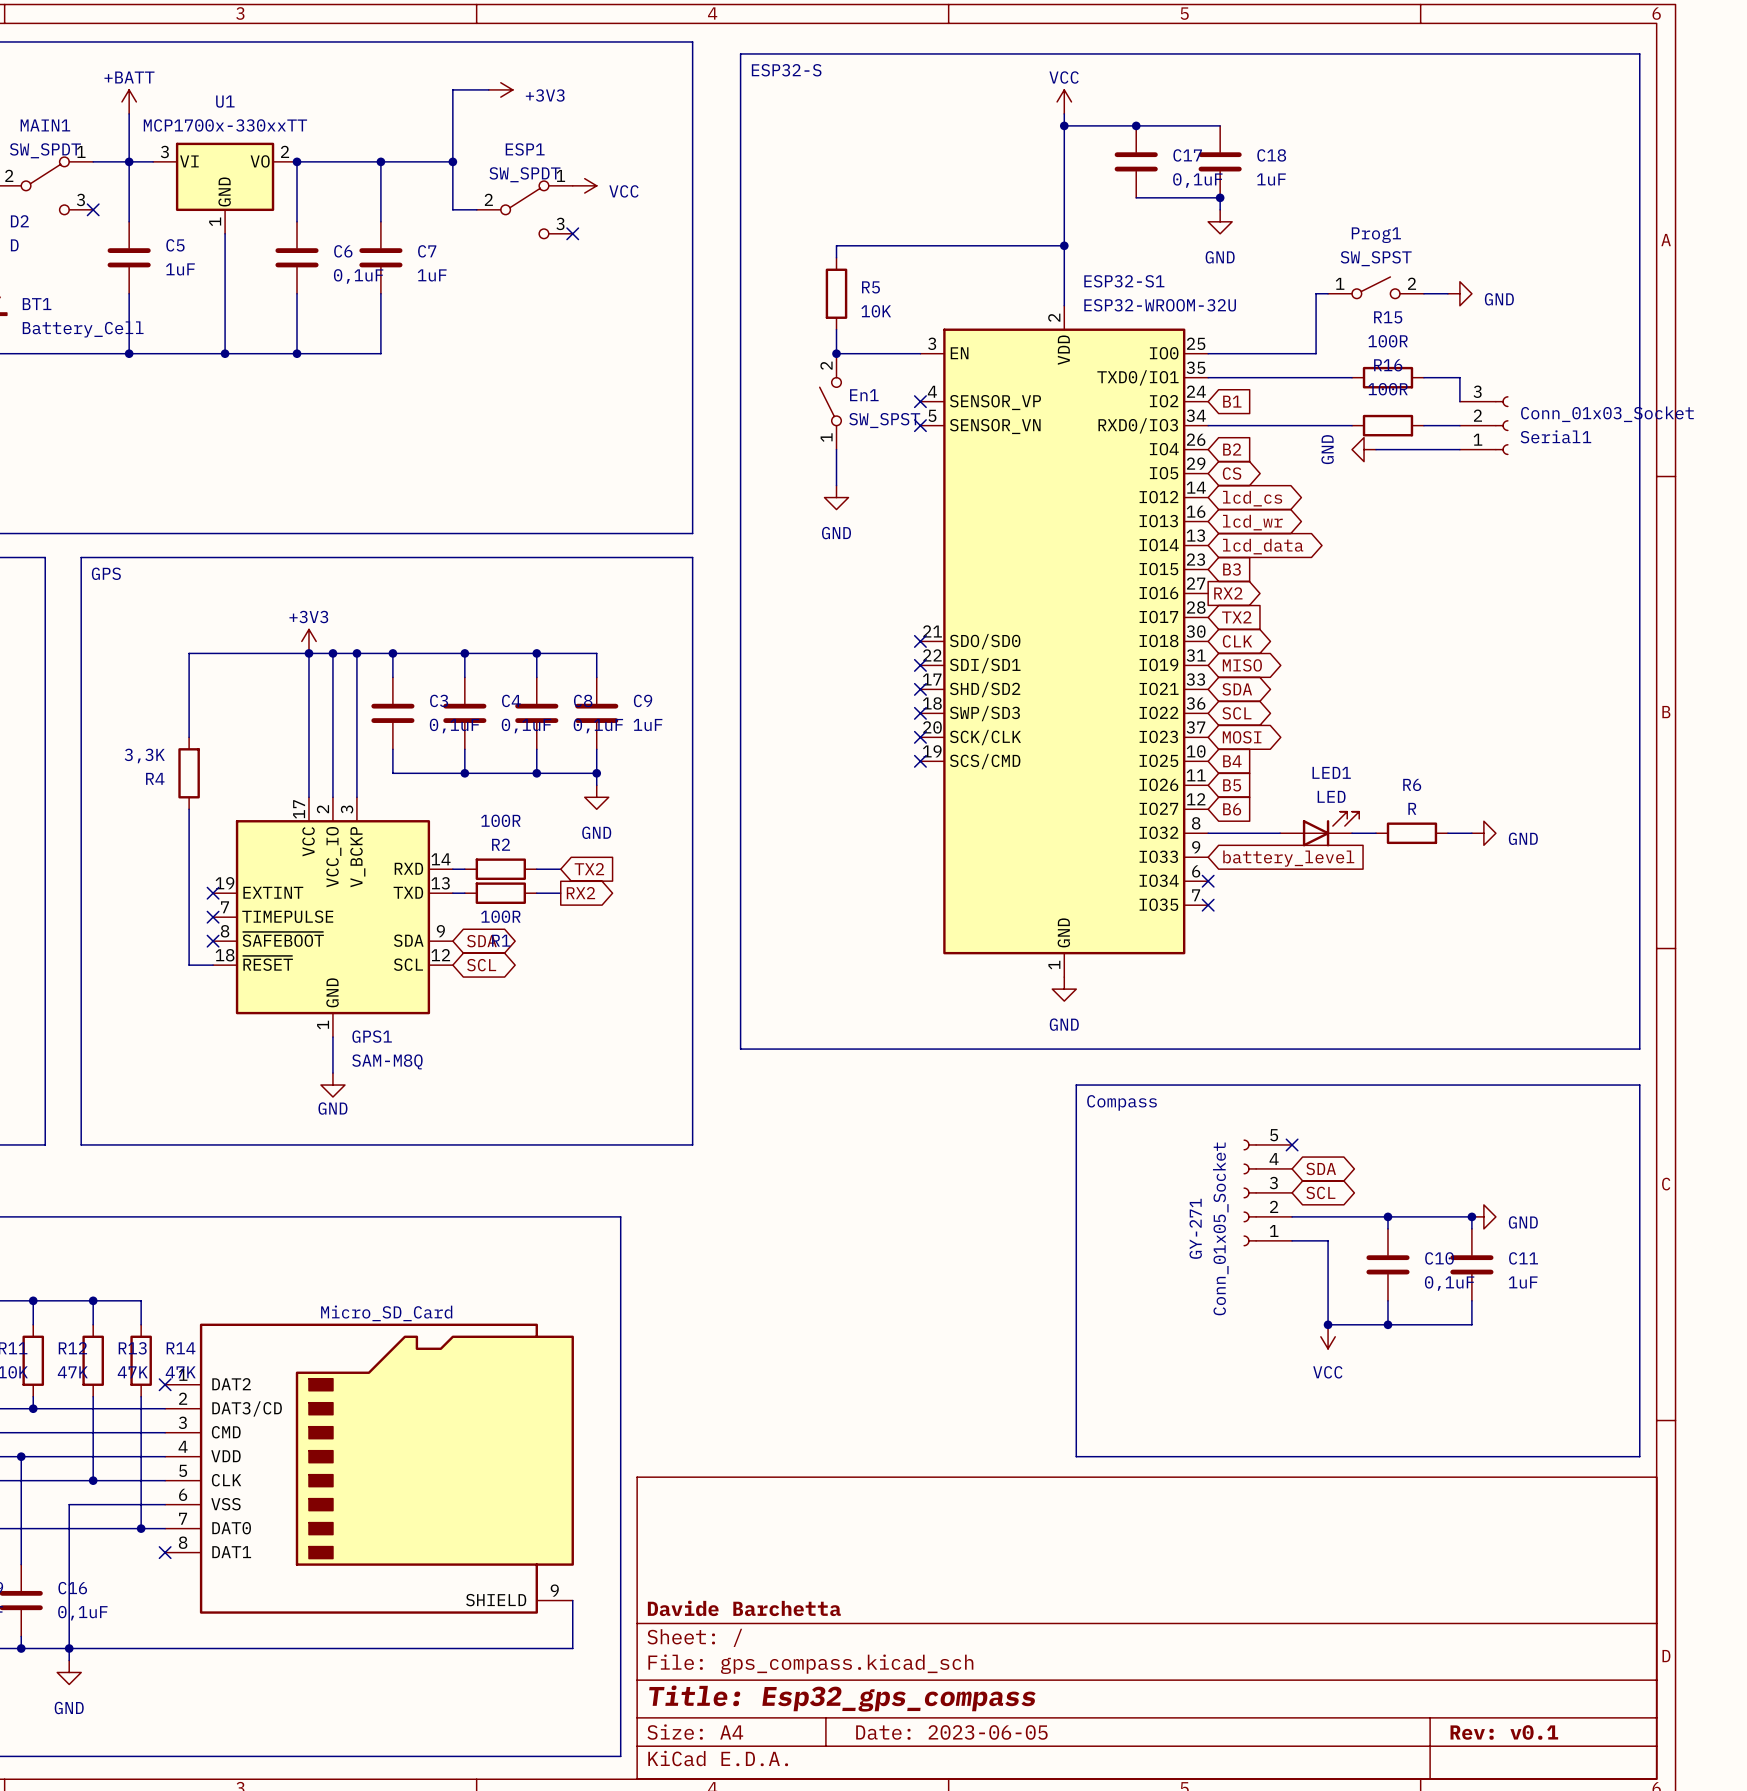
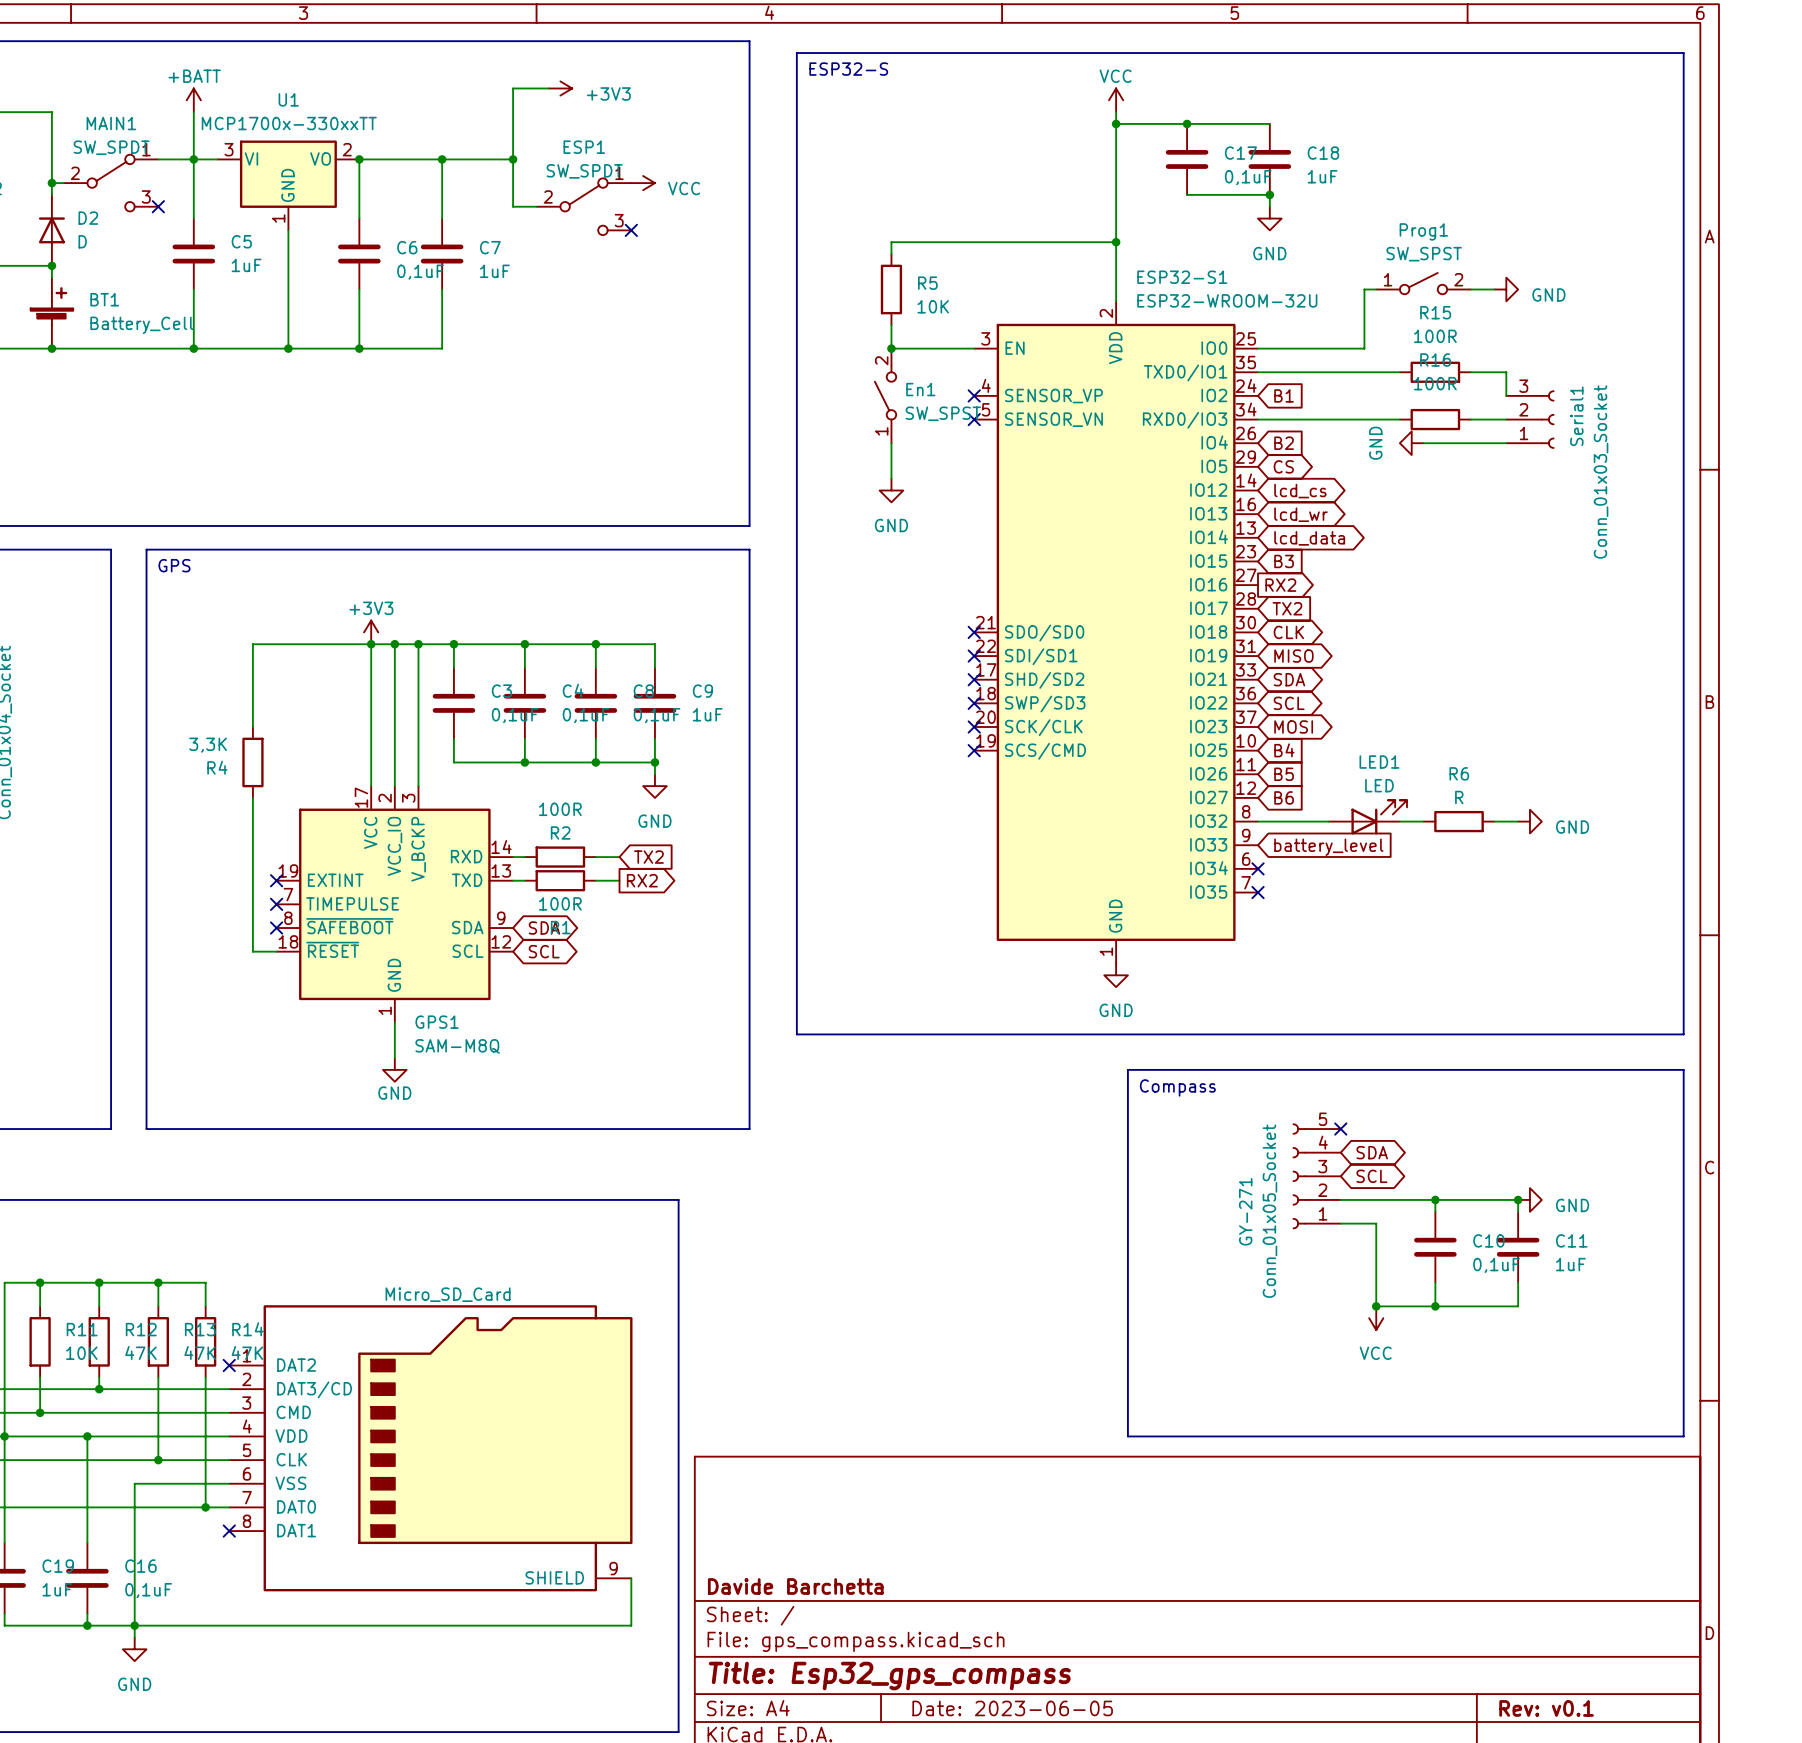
Serial1 value rotation: 0° (1607, 414) -> 90° counterclockwise (1601, 472)
Serial1 name rotation: 0° (1555, 436) -> 90° counterclockwise (1576, 416)

